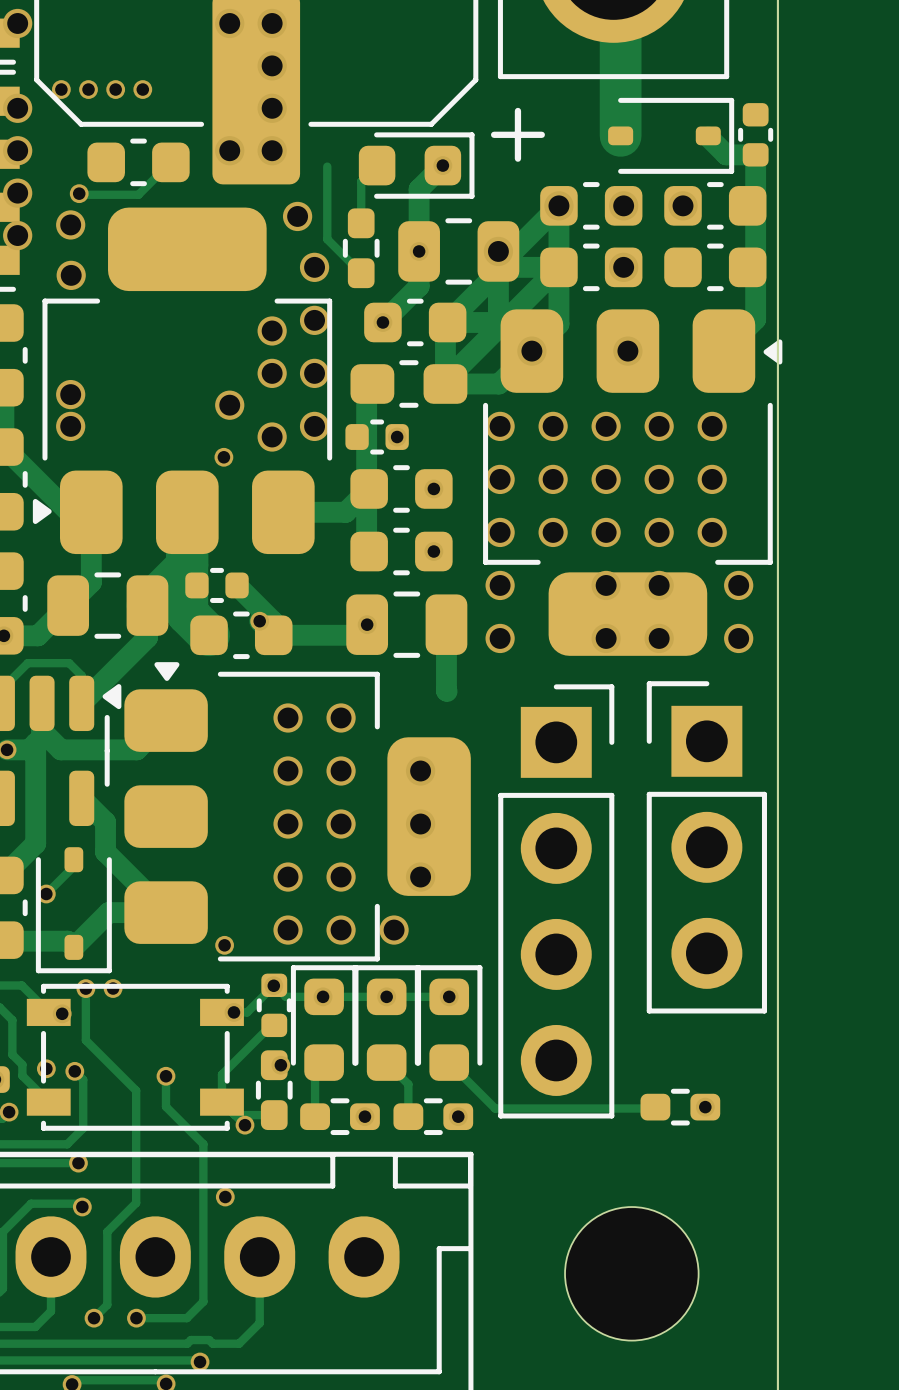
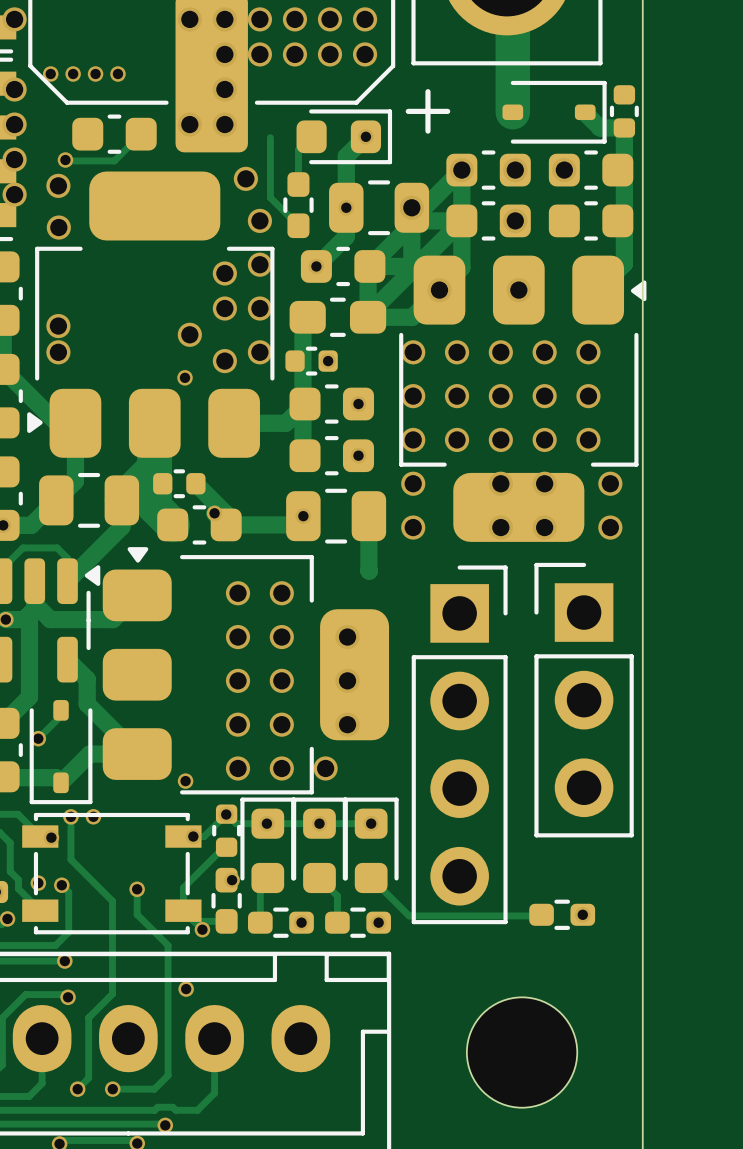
via: none -> (259, 19)
via: none -> (294, 19)
via: none -> (330, 19)
via: none -> (365, 19)
via: none -> (259, 54)
via: none -> (294, 54)
via: none -> (330, 54)
via: none -> (365, 54)

